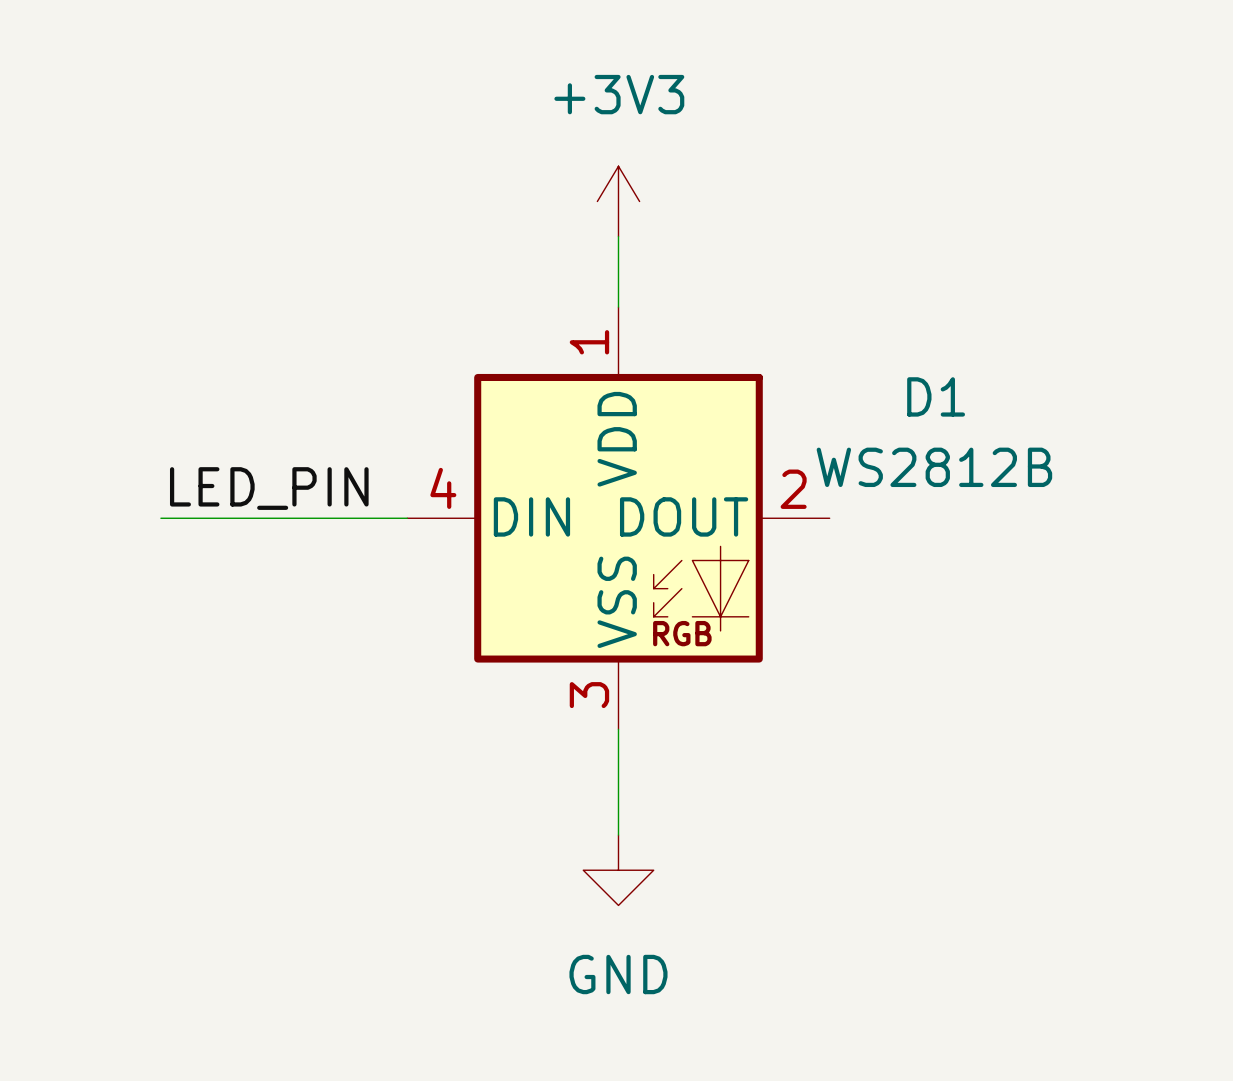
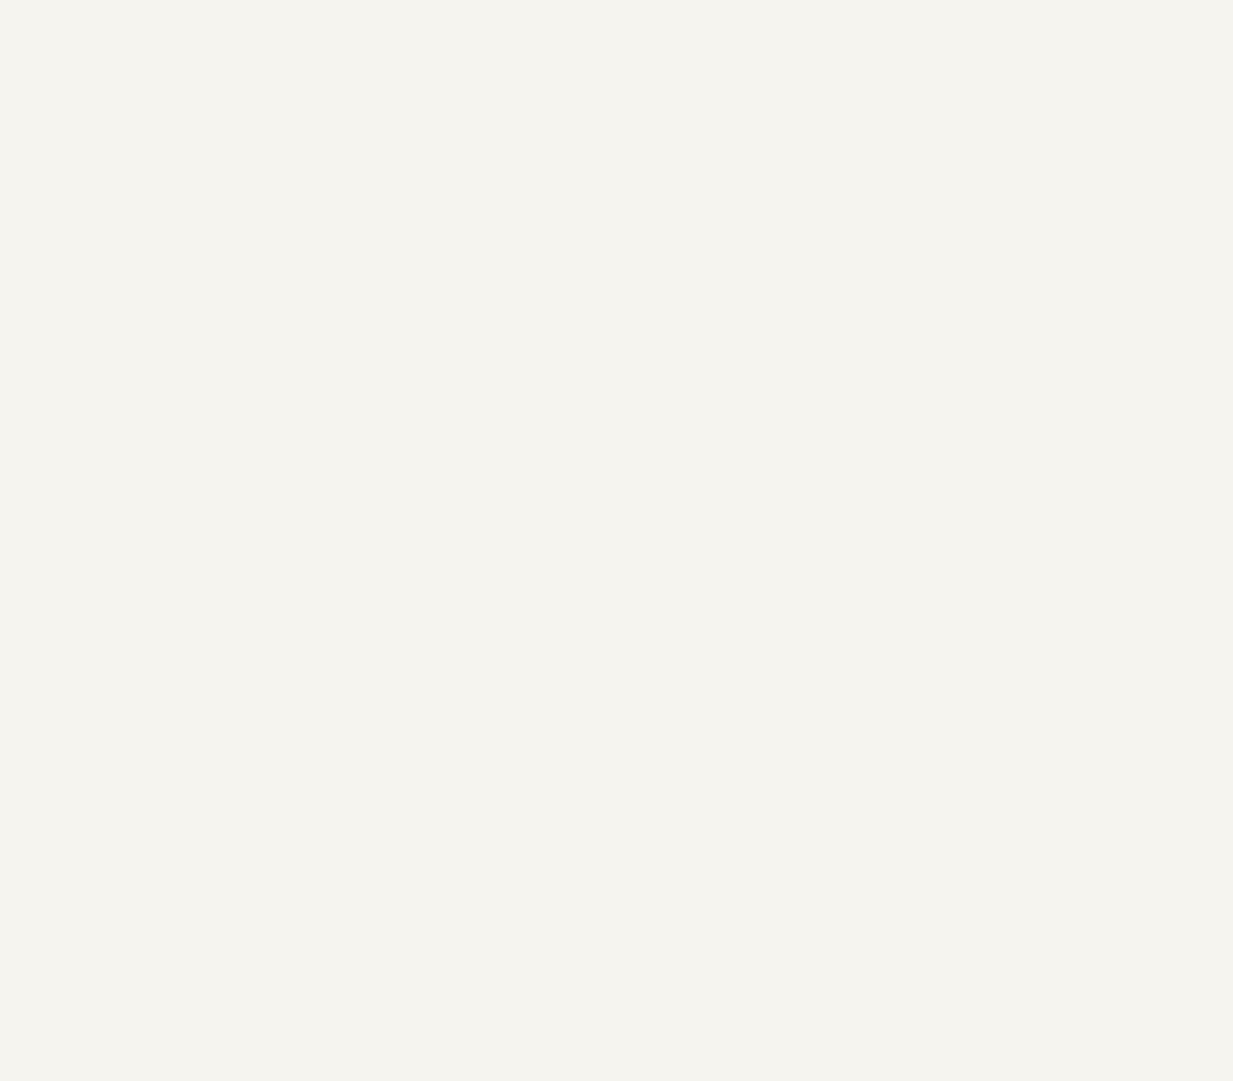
power symbol: +3V3 (618, 201) -> none
wire: (618, 236) (618, 307) -> none
label: LED_PIN (269, 488) -> none
wire: (160, 518) (407, 518) -> none
D1: WS2812B (618, 518) -> none
wire: (618, 729) (618, 835) -> none
power symbol: GND (618, 870) -> none

